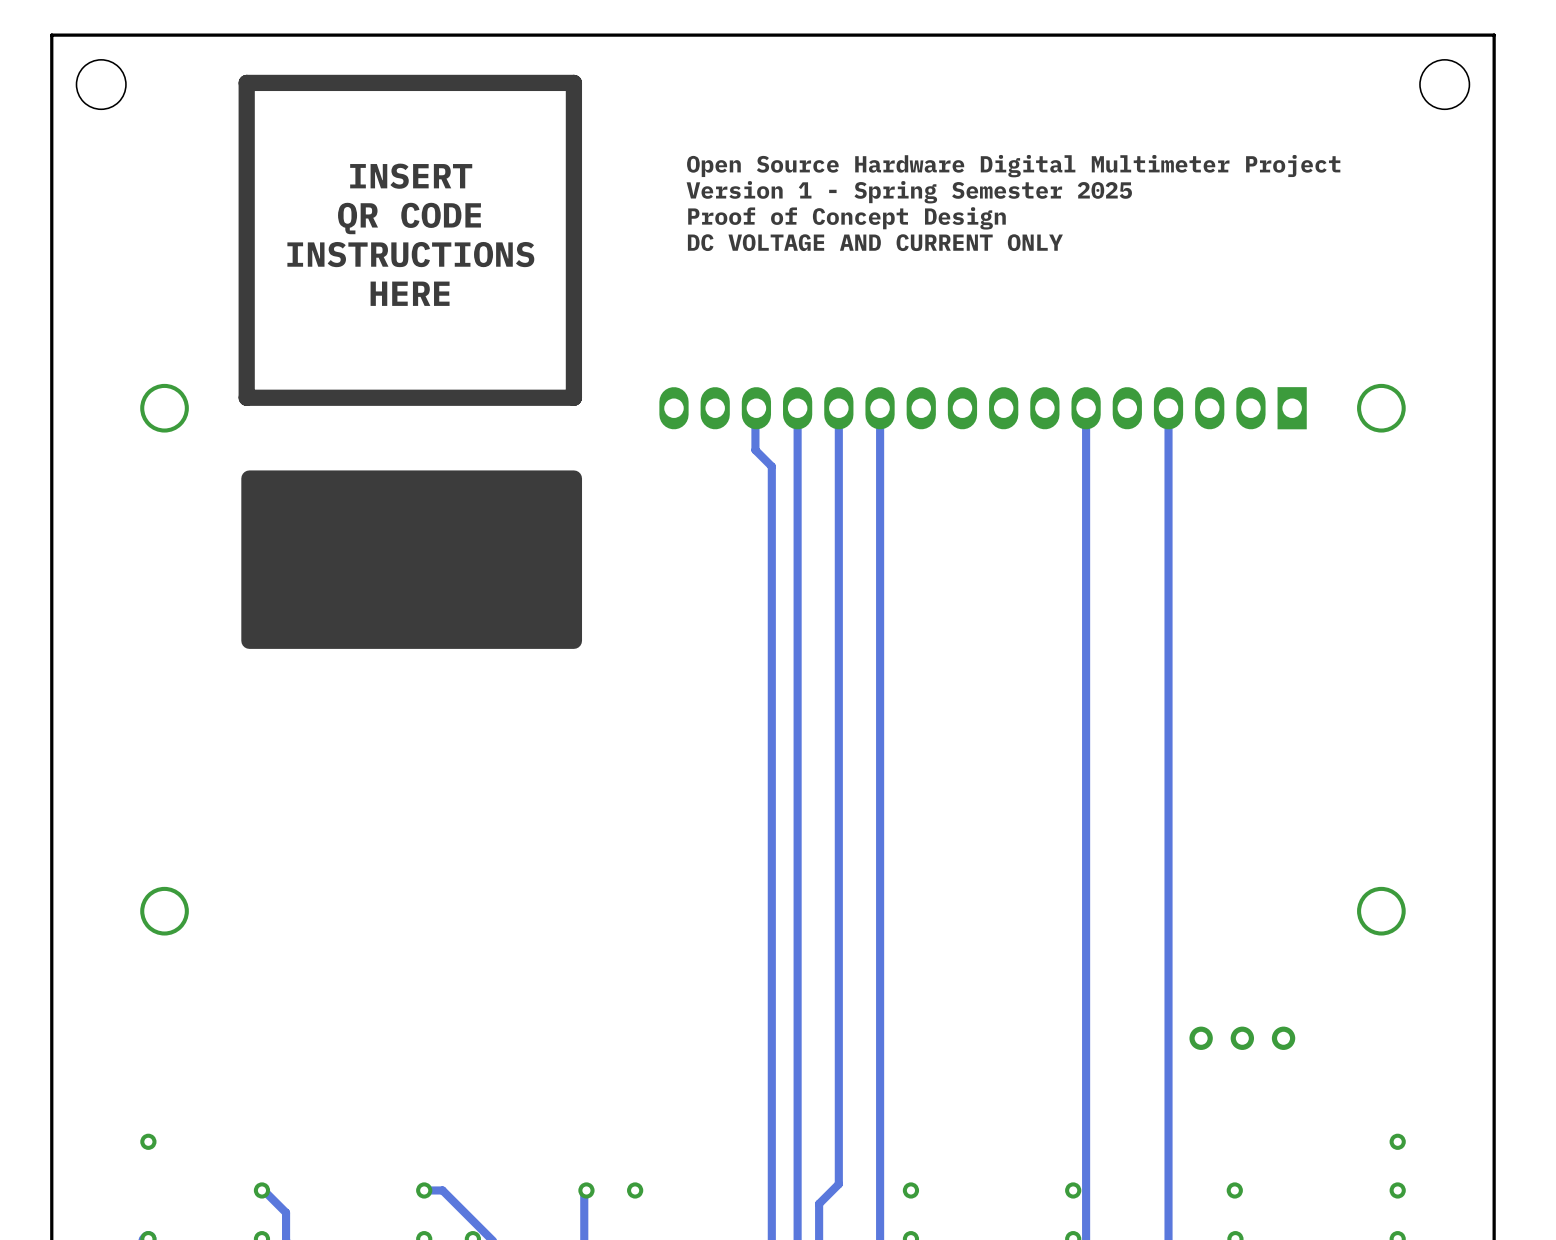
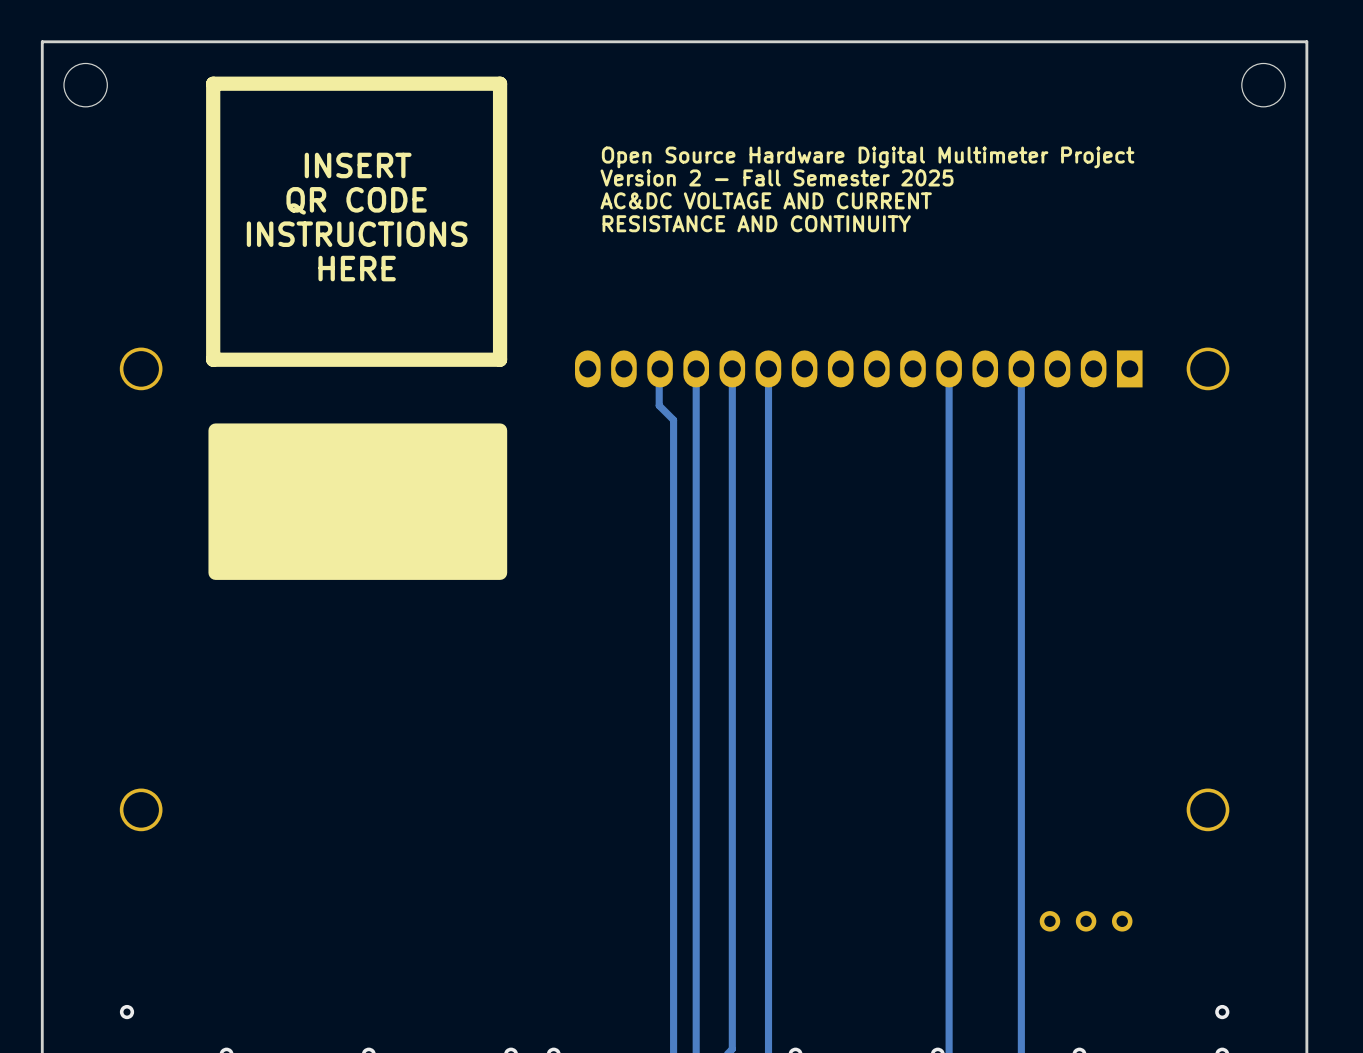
text: Version 1 - Spring Semester 2025 (909, 192) -> Version 2 - Fall Semester 2025 (777, 177)
text: Proof of Concept Design (846, 218) -> AC&DC VOLTAGE AND CURRENT (766, 200)
text: DC VOLTAGE AND CURRENT ONLY (875, 242) -> RESISTANCE AND CONTINUITY (756, 223)

